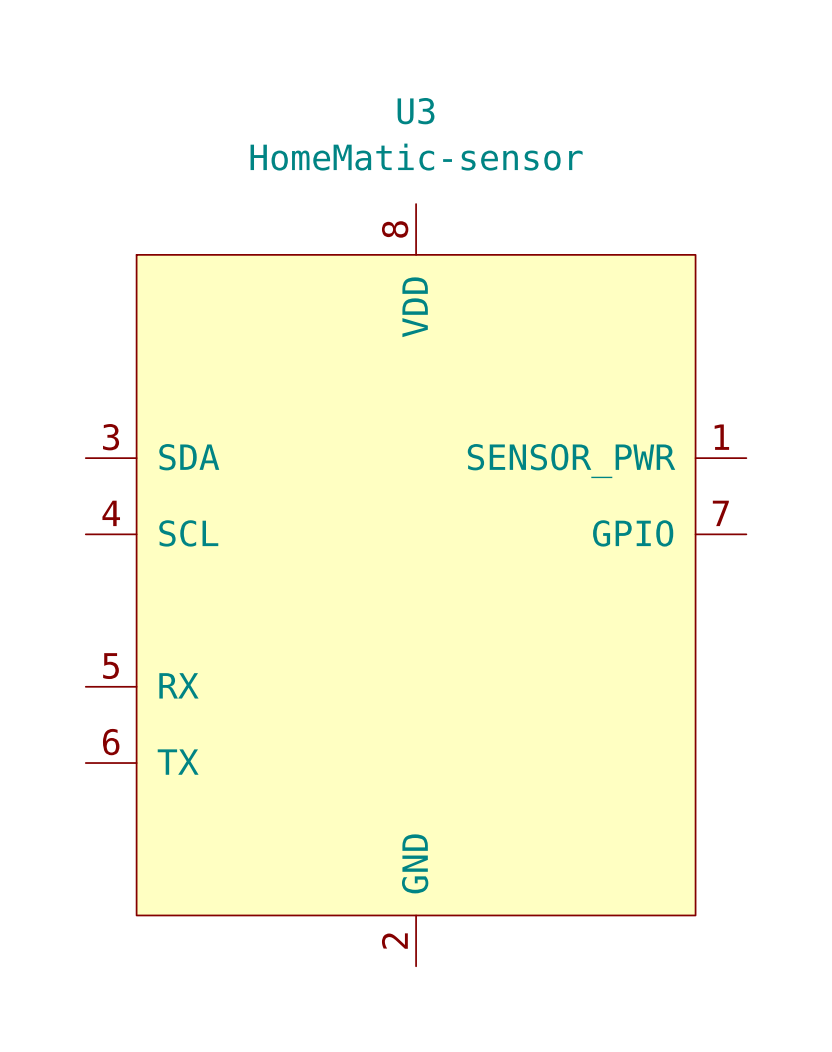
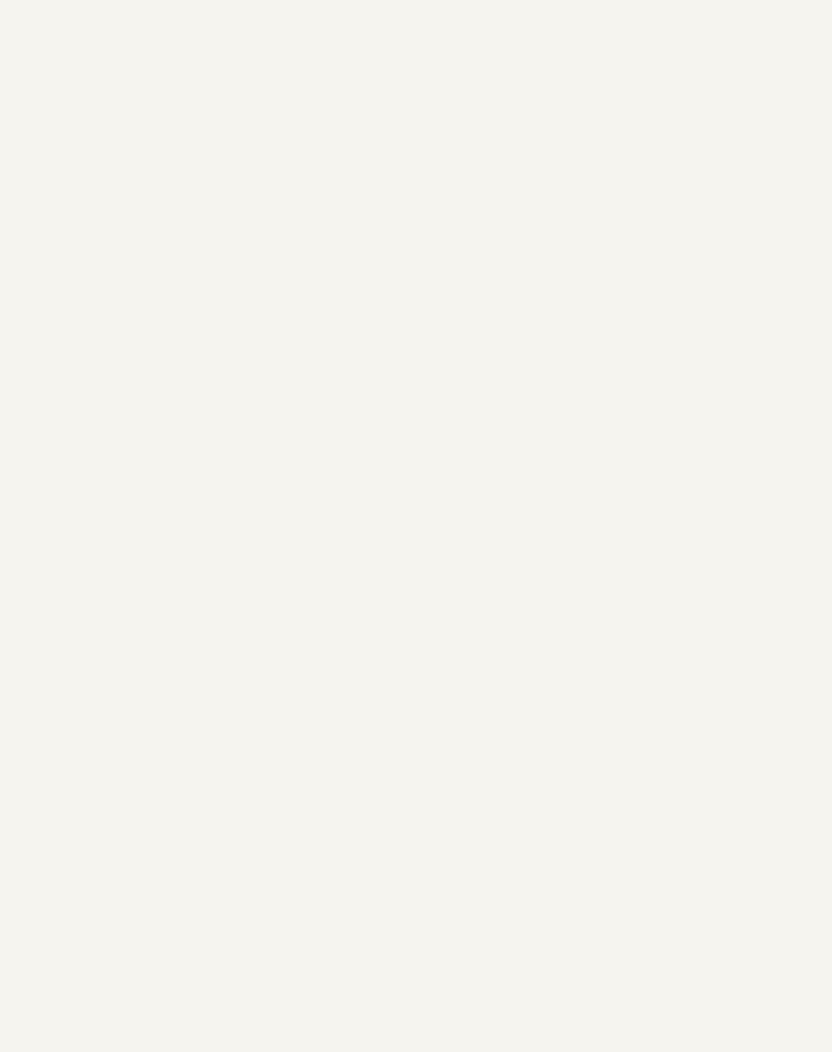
U3: HomeMatic-sensor (416, 585) -> none

